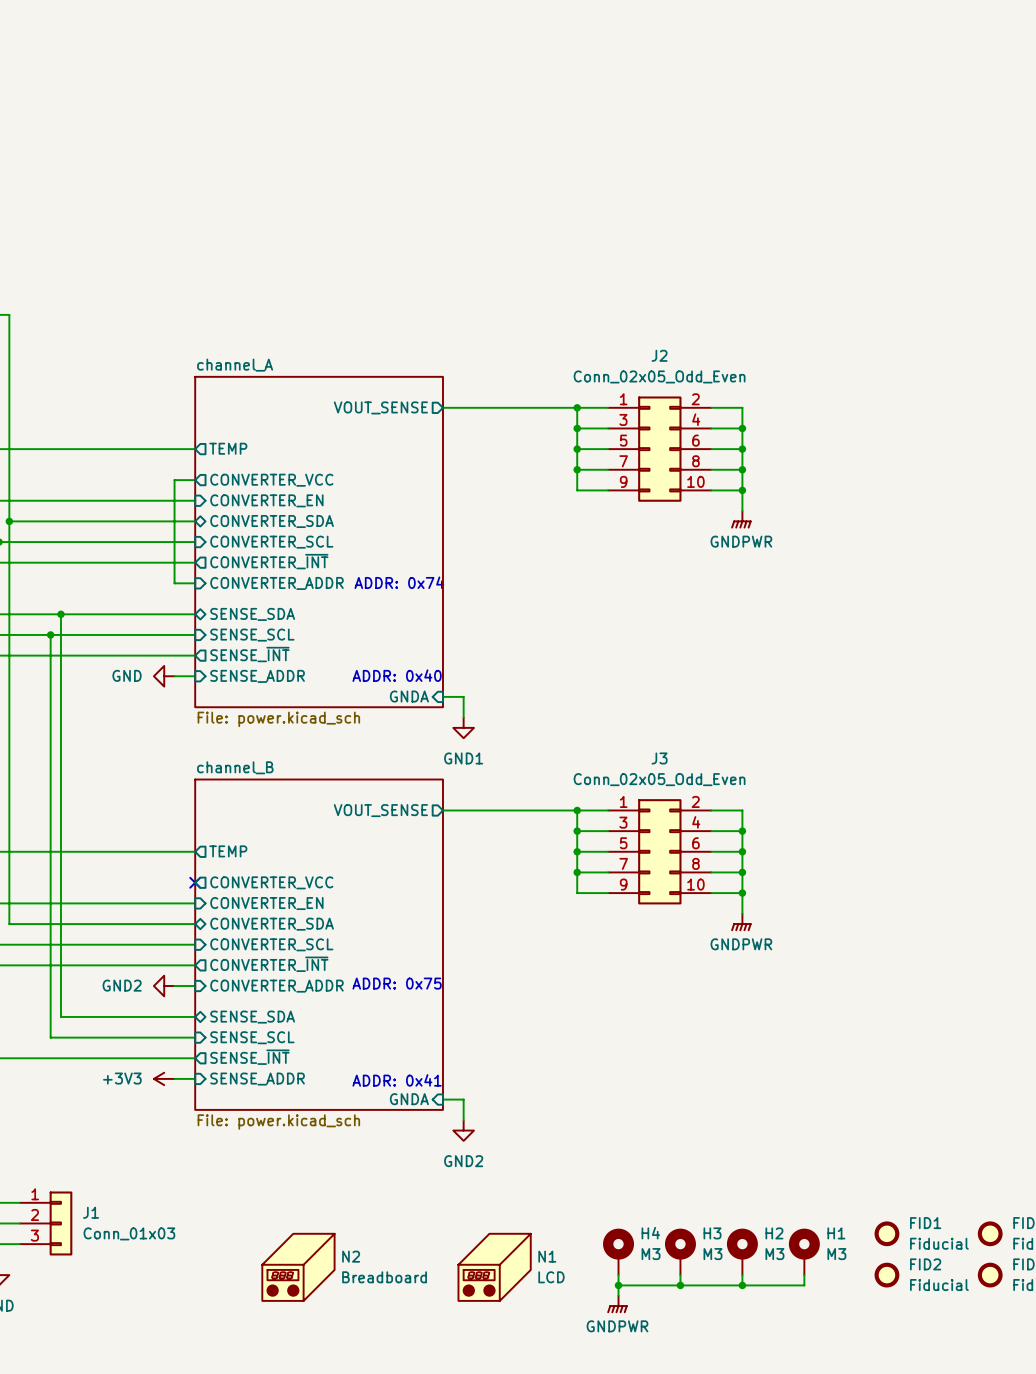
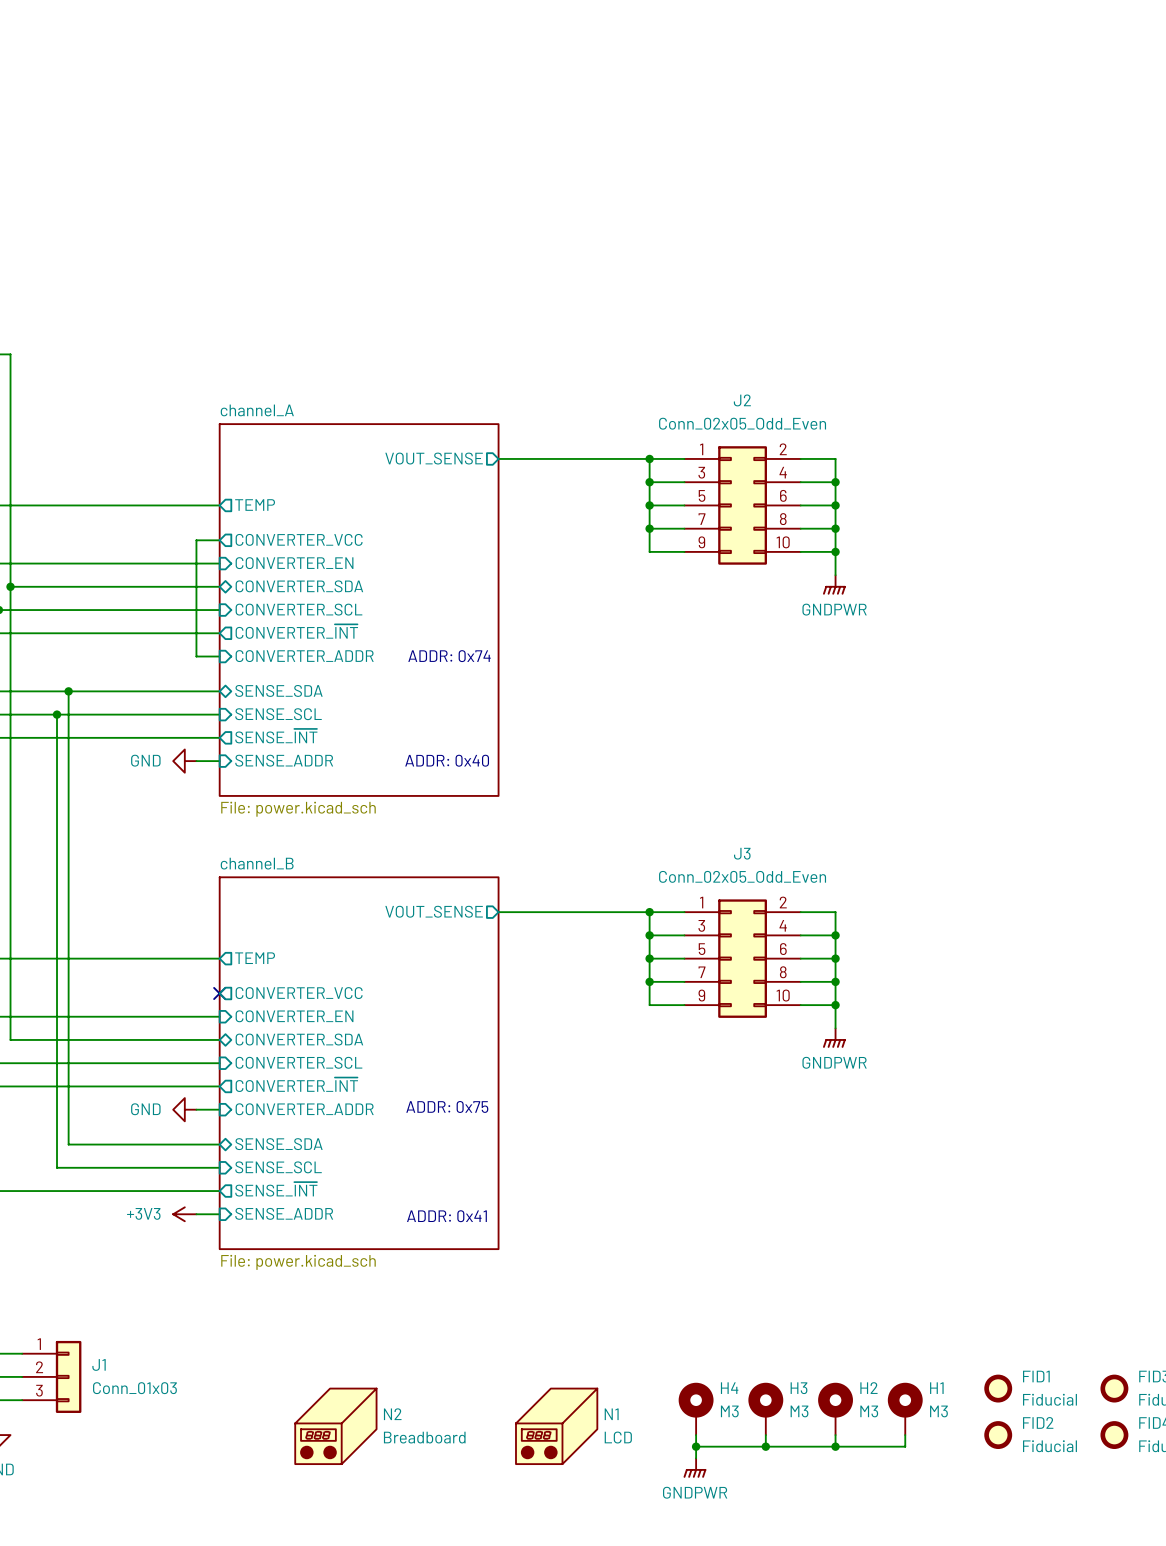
sheet pin: GNDA (409, 696) -> none
wire: (442, 696) (463, 696) (463, 717) -> none
power symbol: GND1 (463, 727) -> none
power symbol: GND2 (164, 986) -> GND (184, 1109)
sheet pin: GNDA (409, 1099) -> none
wire: (442, 1099) (463, 1099) (463, 1120) -> none
power symbol: GND2 (463, 1130) -> none

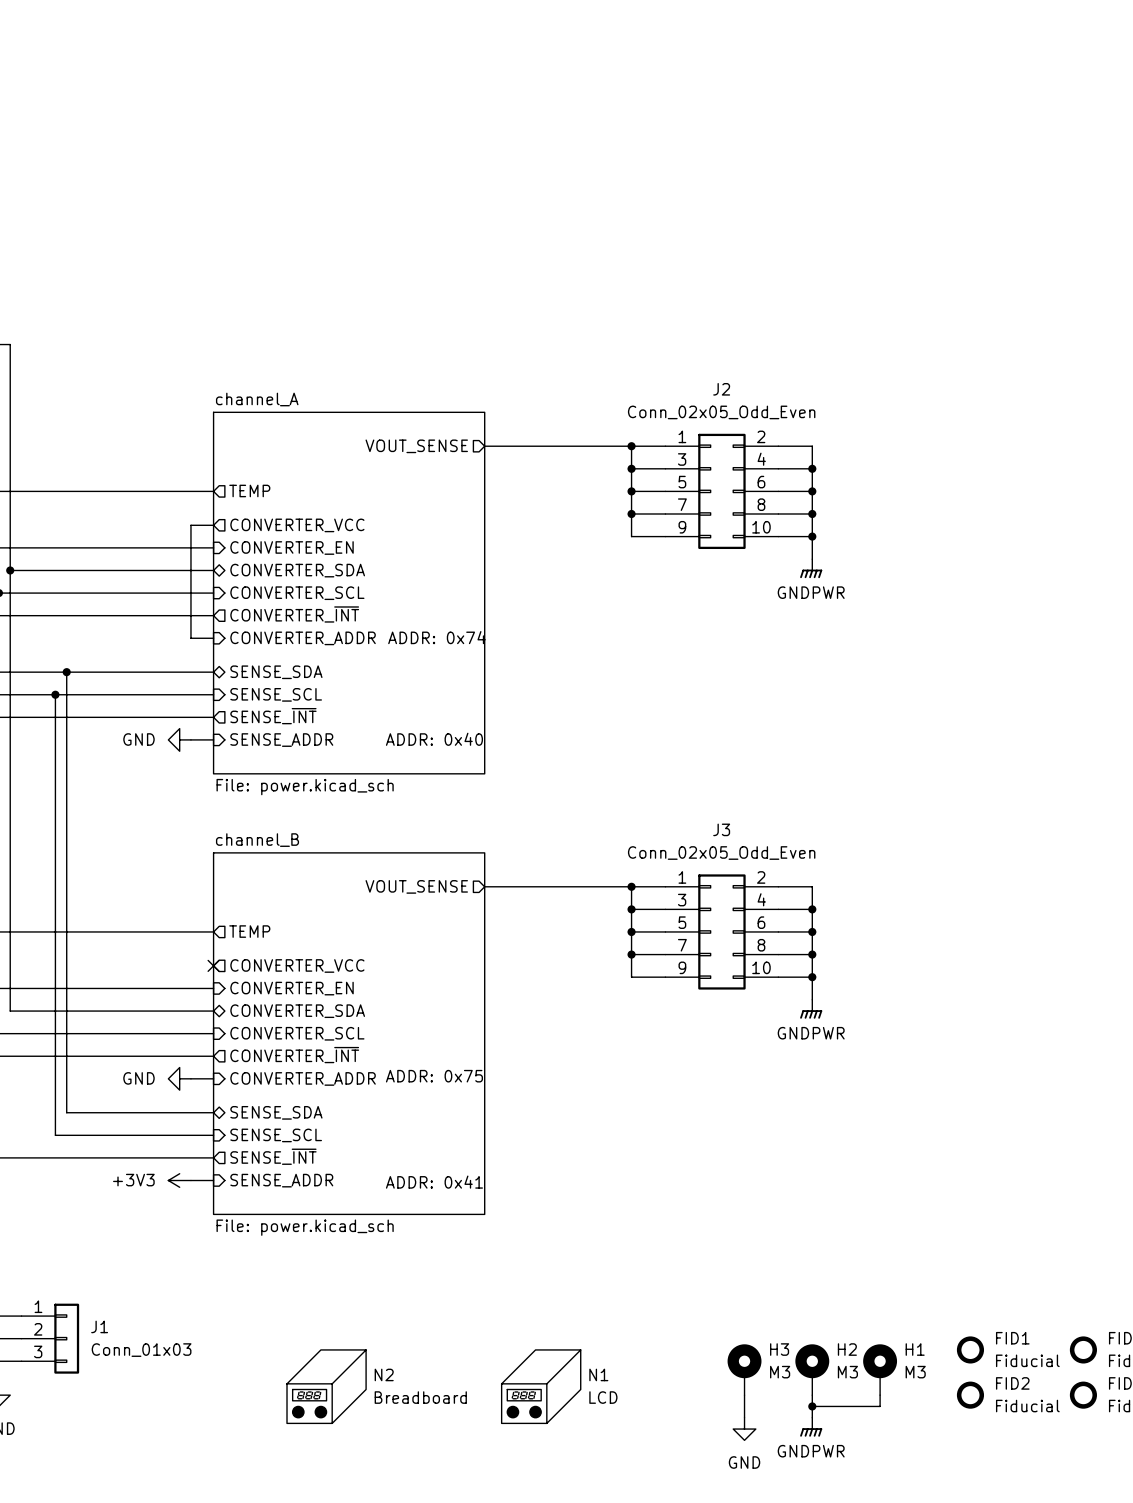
H4: M3 (696, 1408) -> none
wire: (696, 1435) (696, 1458) -> none
wire: (696, 1446) (835, 1446) -> (812, 1417) (812, 1406)
junction: (696, 1446) -> none
wire: none -> (744, 1406) (744, 1417)
junction: (765, 1446) -> none
power symbol position: GNDPWR (694, 1468) -> GNDPWR (811, 1427)
power symbol: none -> GND (744, 1429)

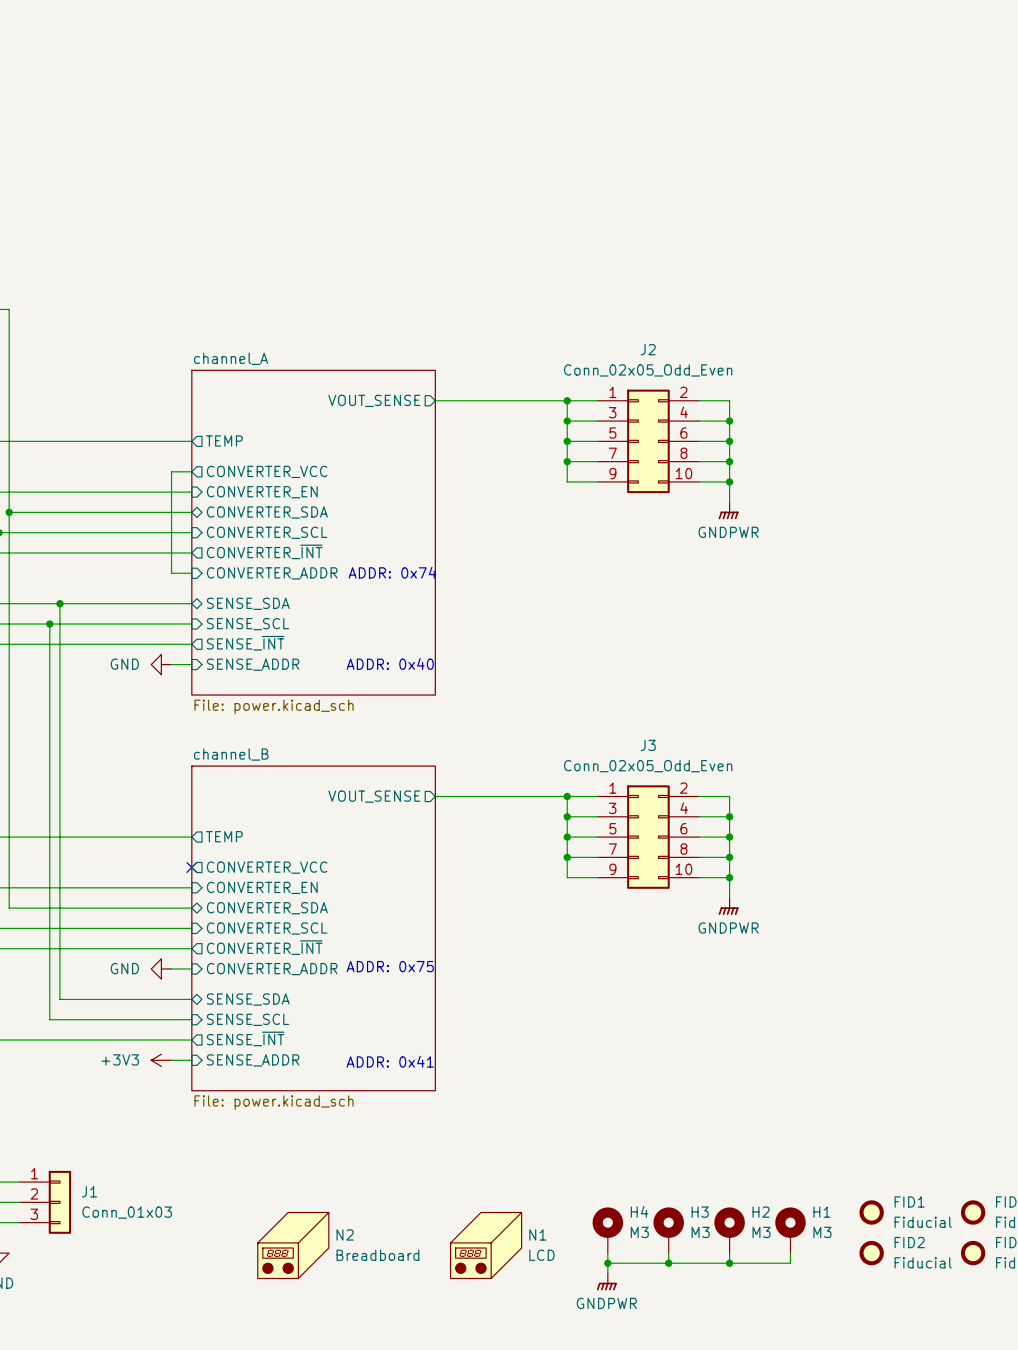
H4: none -> M3 (607, 1230)
wire: none -> (607, 1253) (607, 1273)
junction: none -> (607, 1263)
wire: (744, 1406) (744, 1417) -> none
junction: none -> (668, 1263)
wire: (812, 1406) (812, 1417) -> (729, 1263) (607, 1263)
power symbol position: GNDPWR (811, 1427) -> GNDPWR (606, 1281)
power symbol: GND (744, 1429) -> none

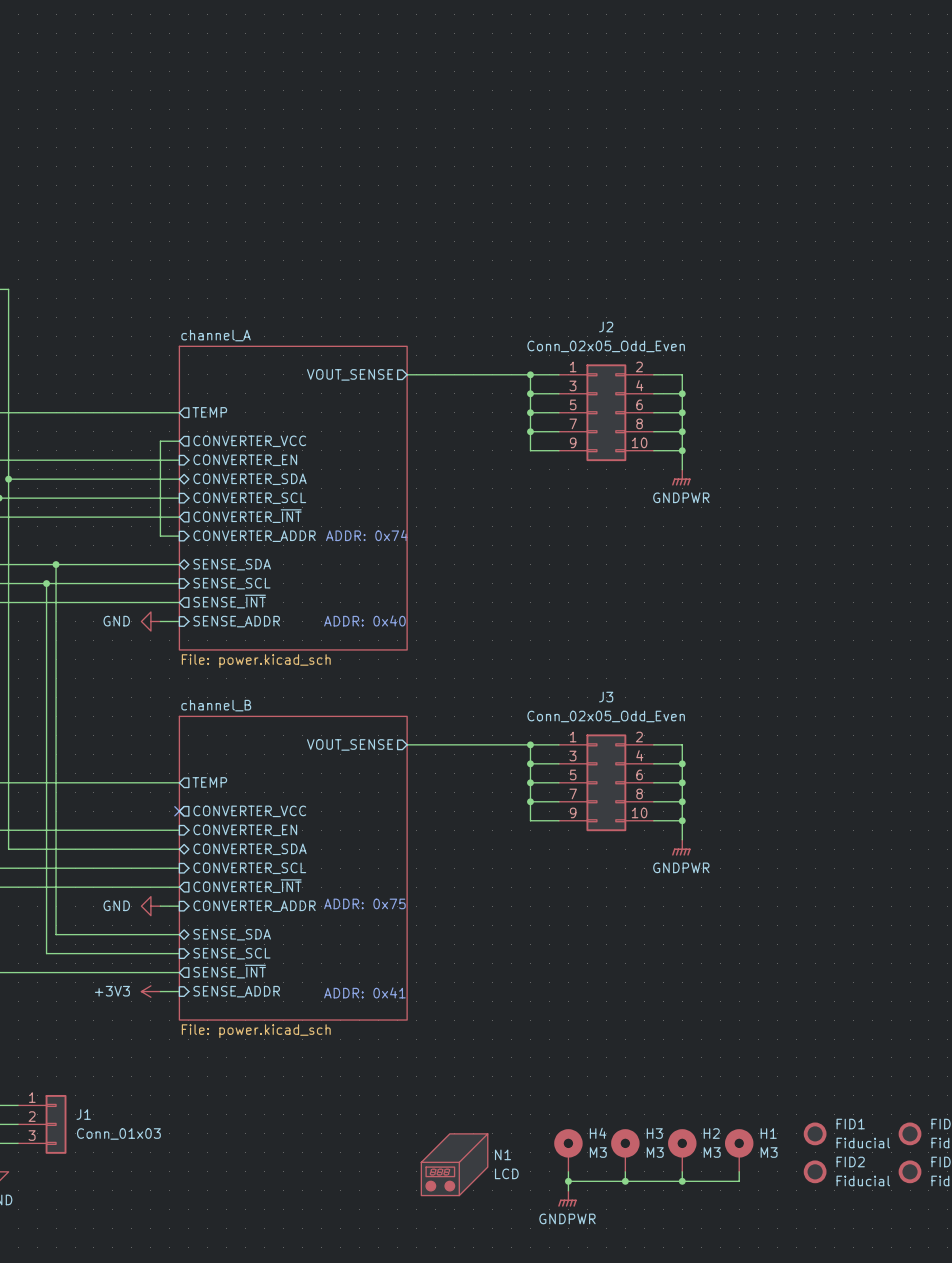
N2: Breadboard (293, 1245) -> none

